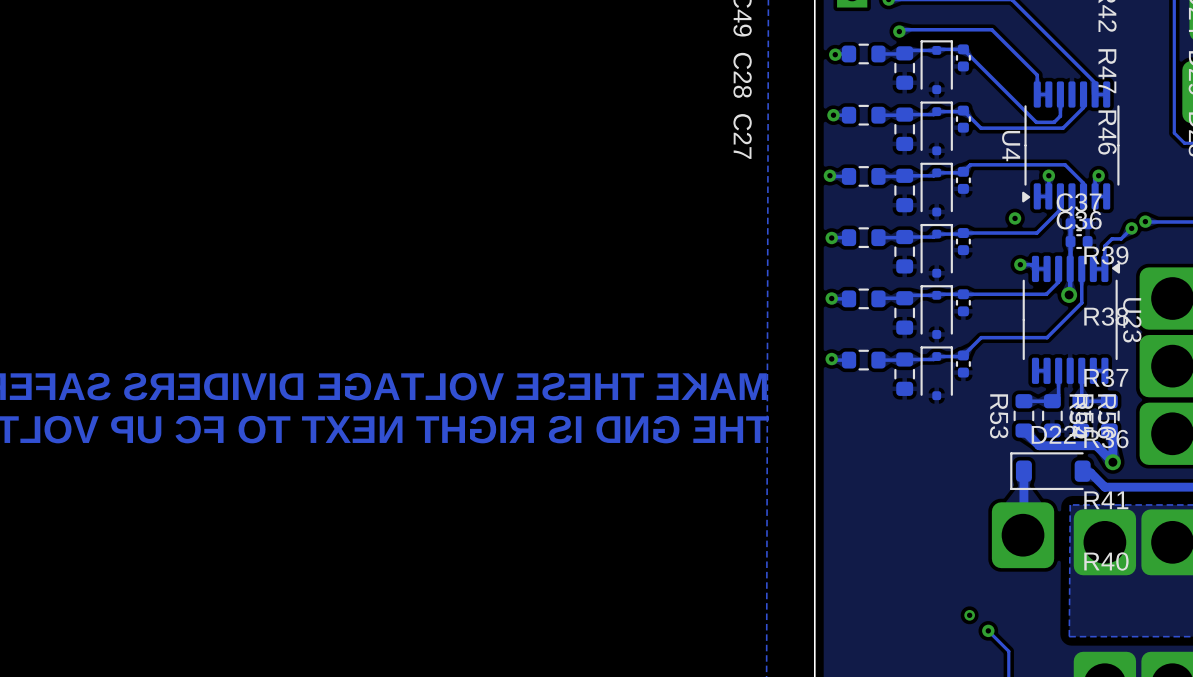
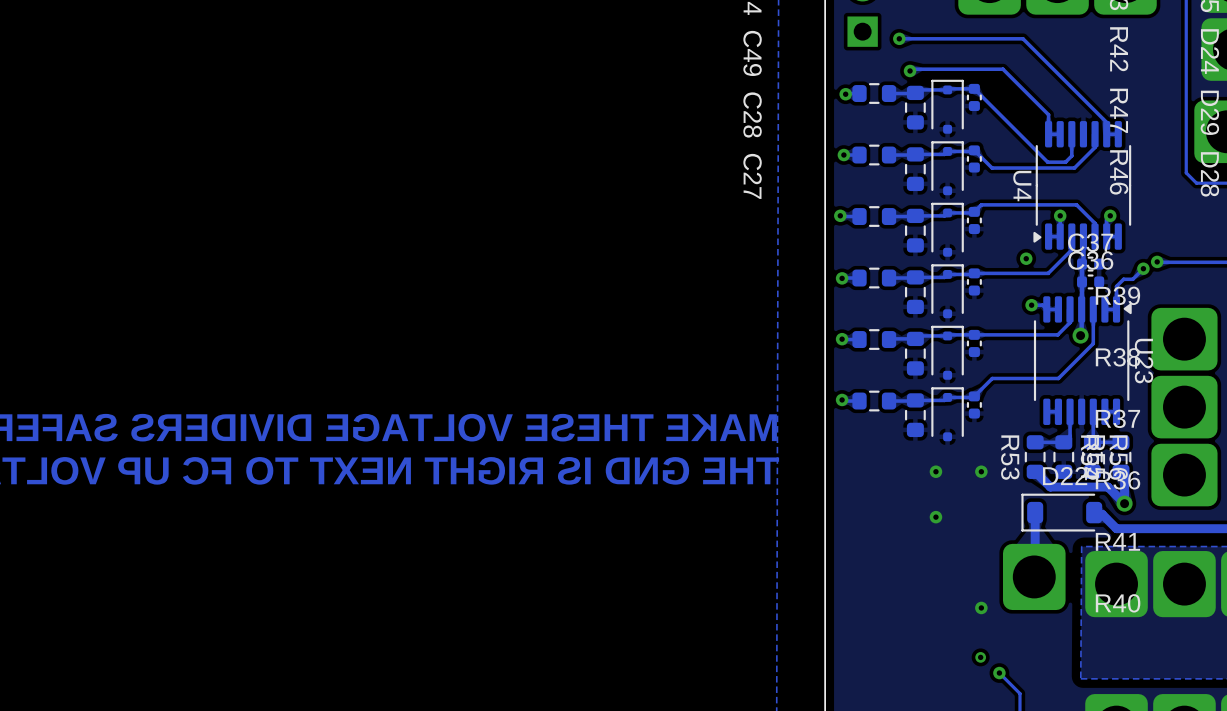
via: none -> (935, 471)
via: none -> (981, 471)
via: none -> (935, 517)
via: none -> (981, 607)

